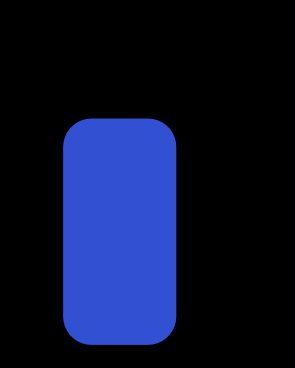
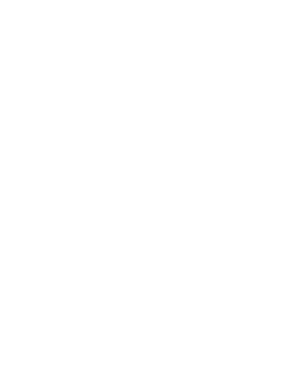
part: (119, 231) -> none

